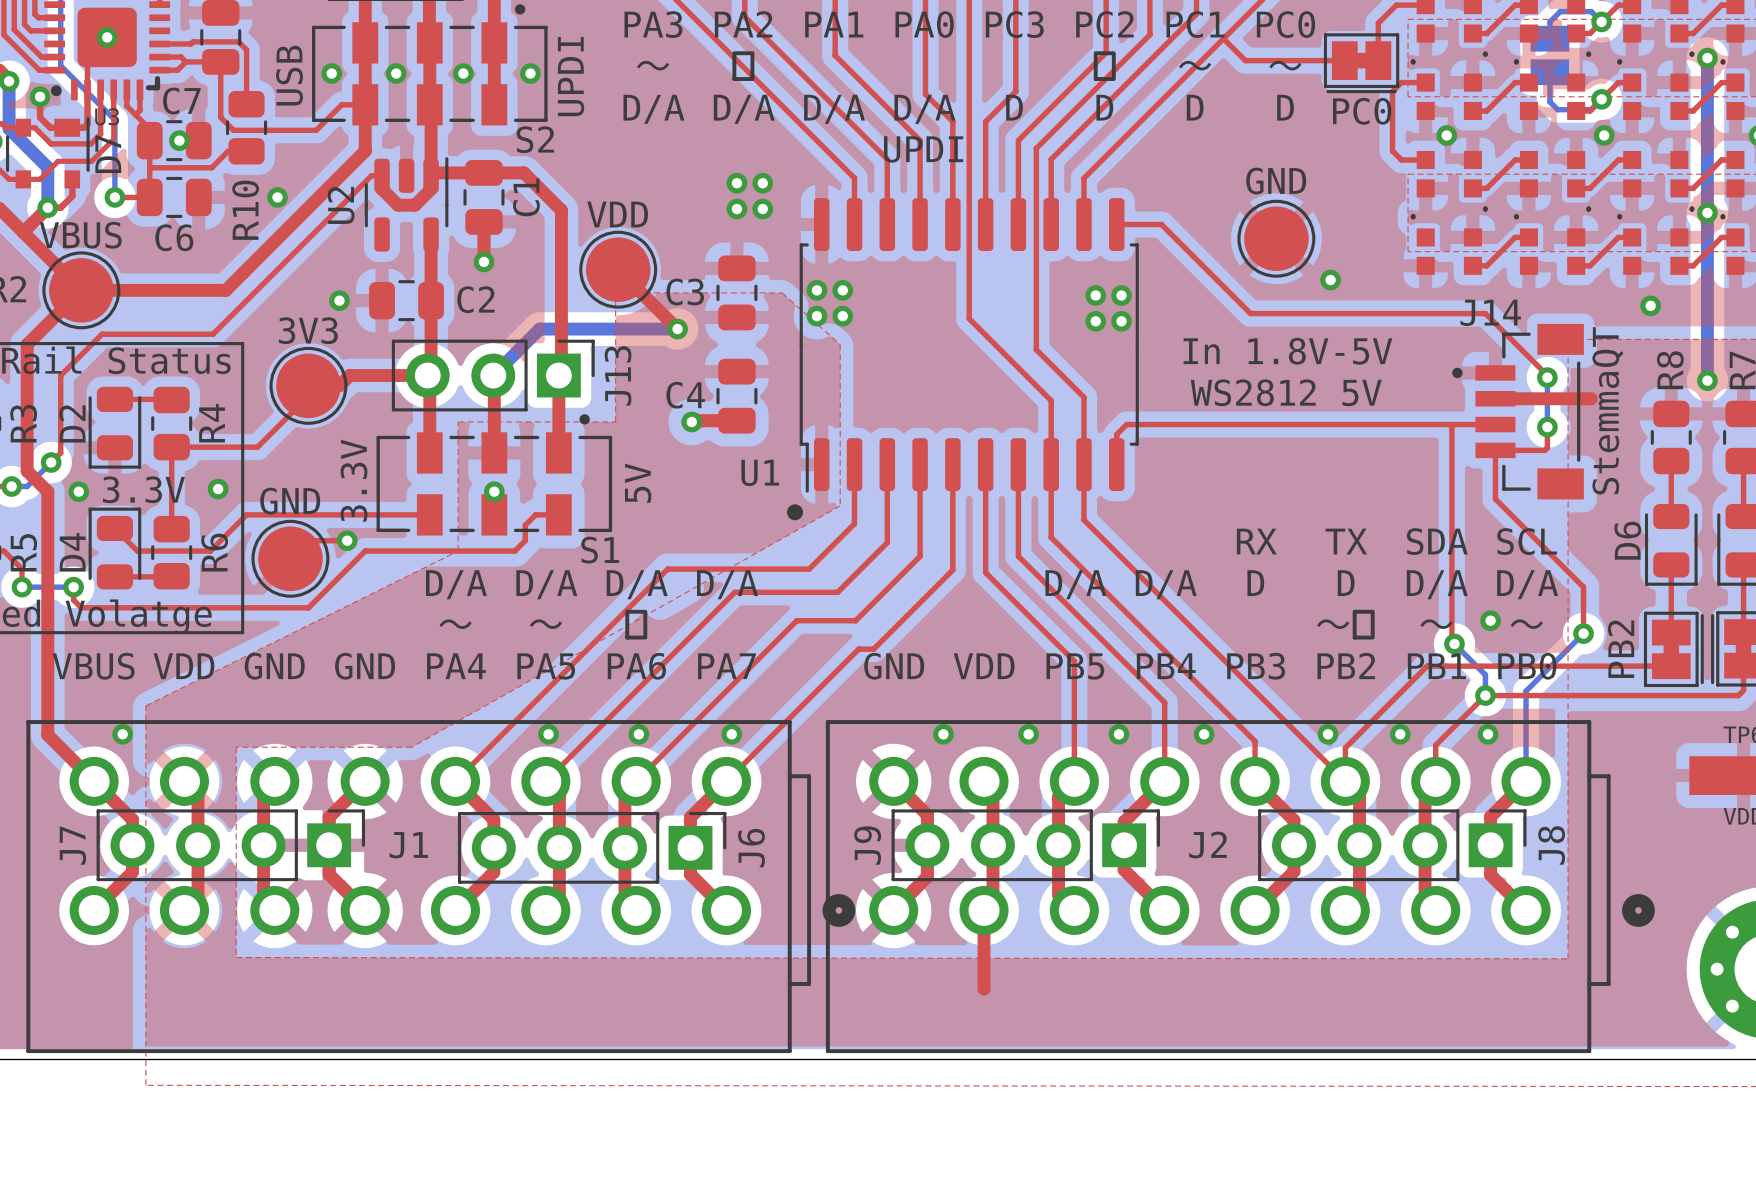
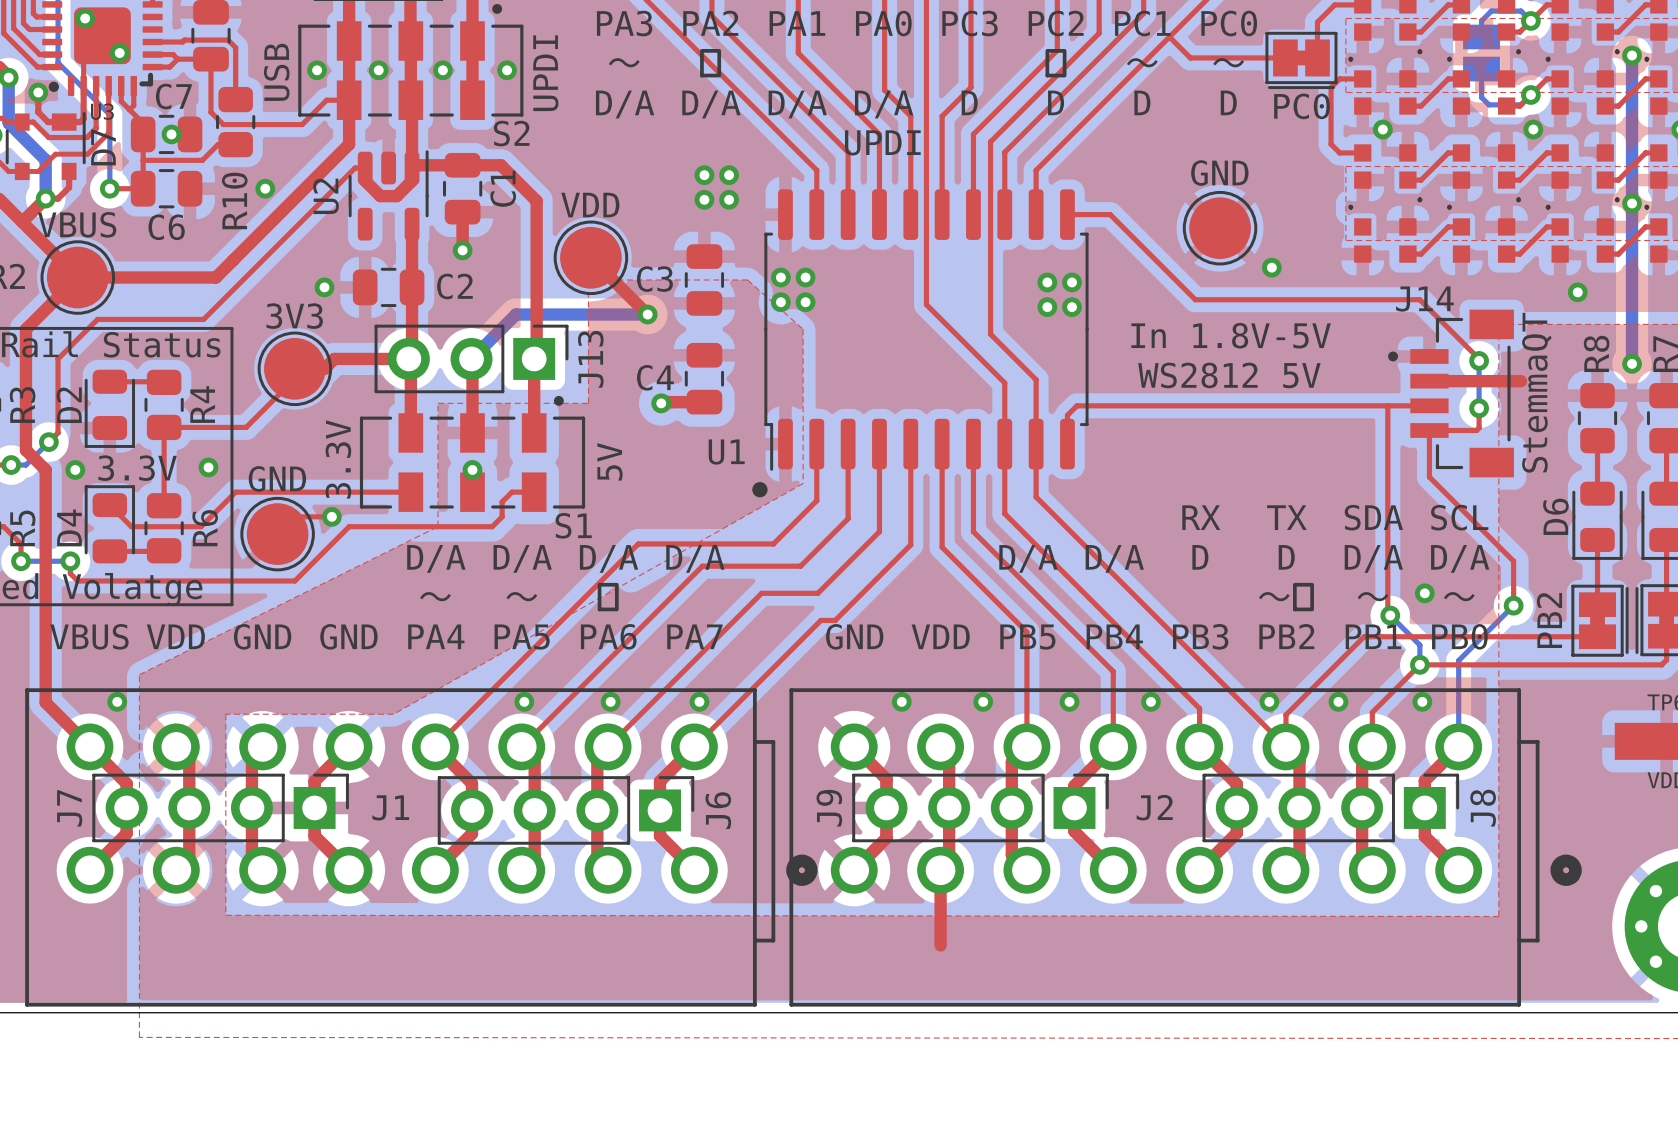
via: none -> (85, 18)
via: (107, 37) -> none
via: none -> (119, 53)

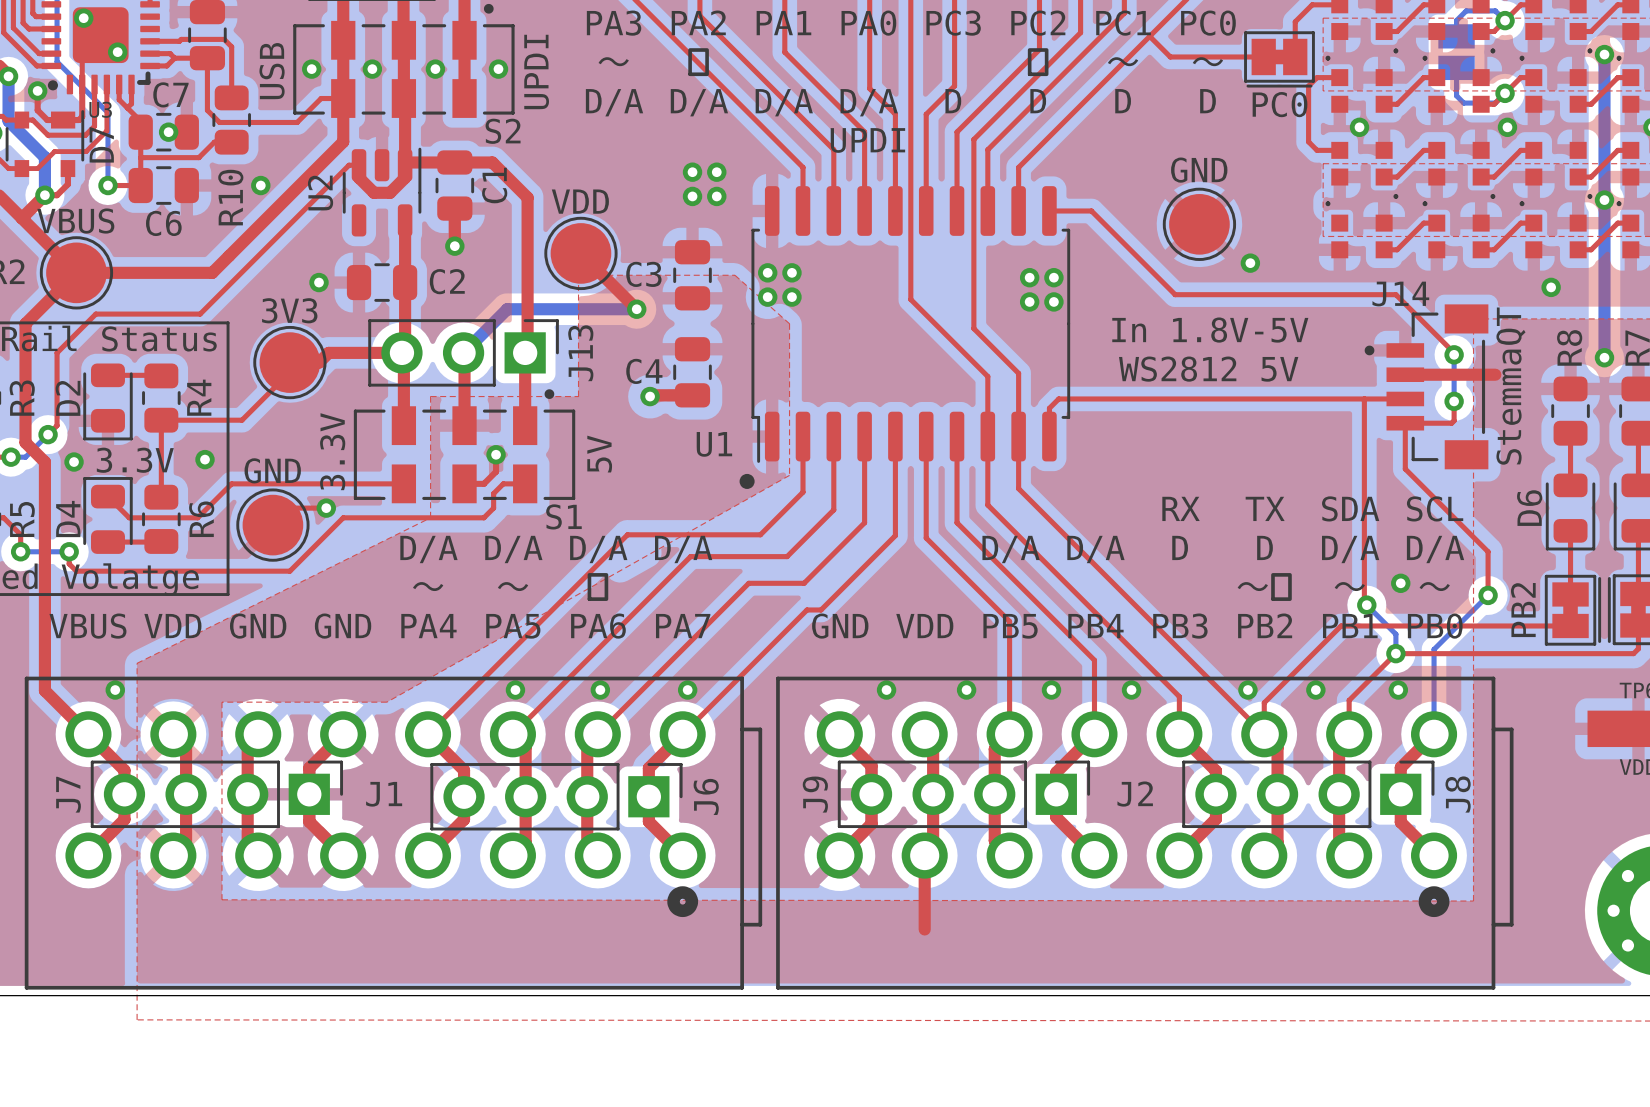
top track: none -> (496, 454) (496, 471) (483, 483) (464, 483)
via position: (472, 469) -> (496, 454)
J1 footprint: [25, 688, 818, 1007] -> [24, 676, 763, 990]
J2 footprint: [789, 688, 1582, 1007] -> [776, 676, 1514, 990]

